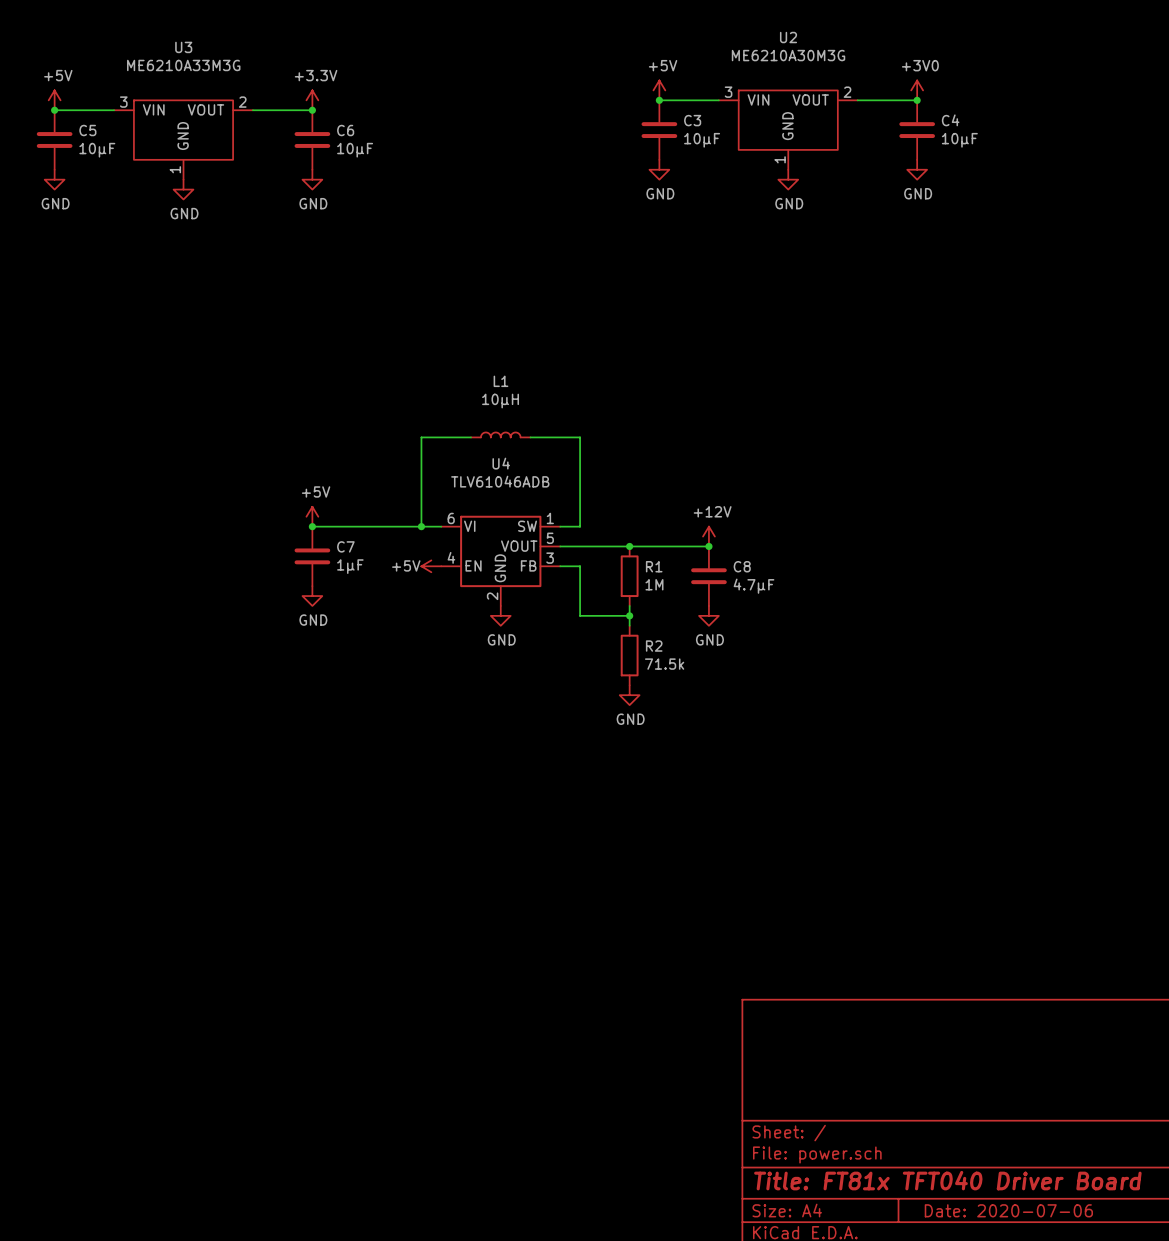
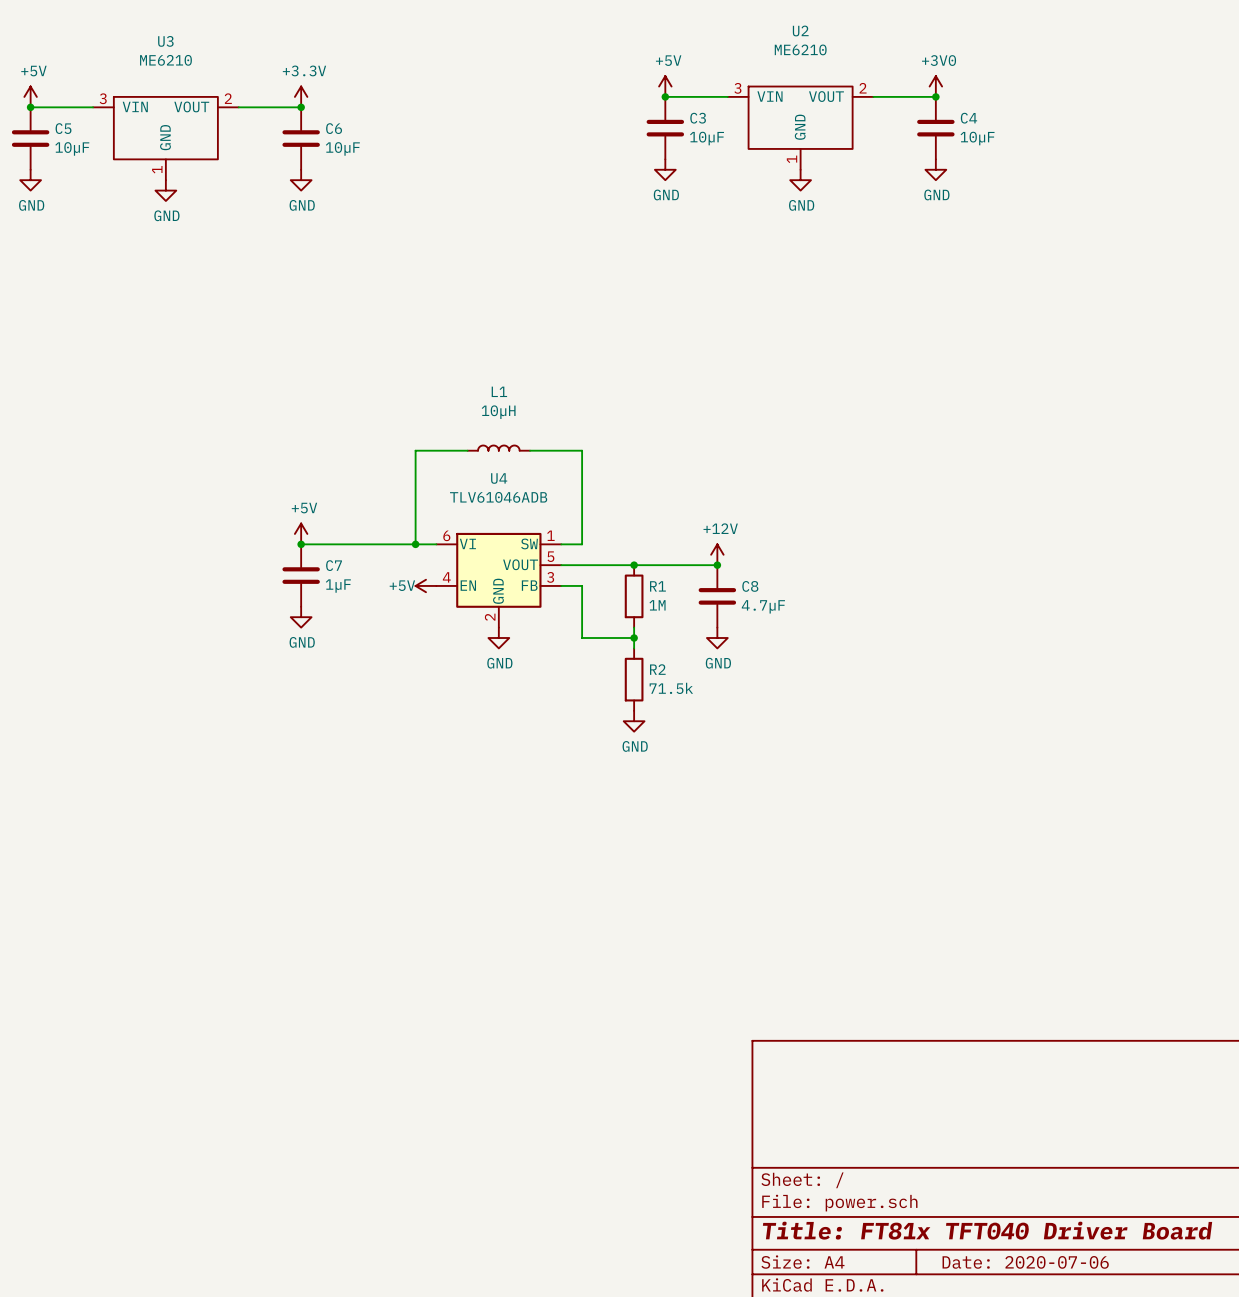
U2 value: ME6210A30M3G (788, 55) -> ME6210 (800, 49)
U3 value: ME6210A33M3G (183, 65) -> ME6210 (165, 60)

